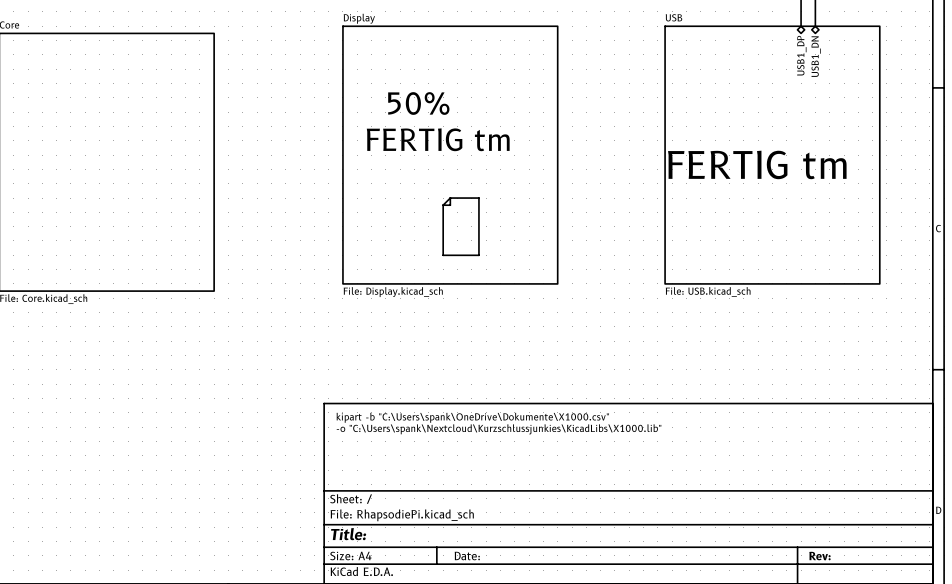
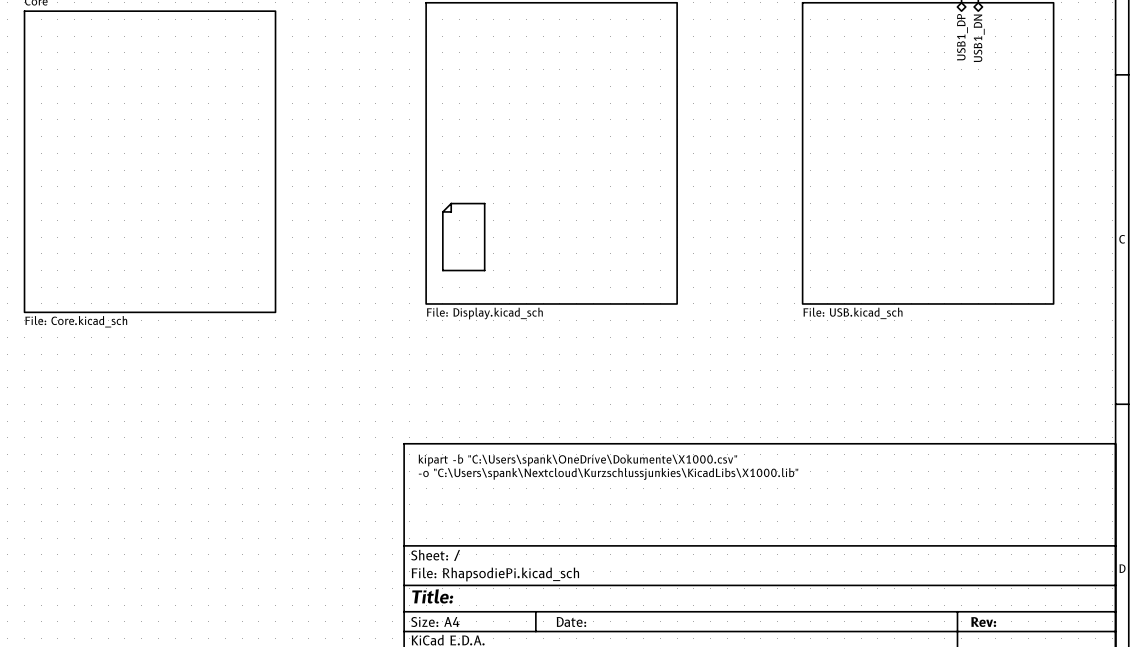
text: 50% (418, 103) -> none
text: FERTIG tm (438, 139) -> none
text: FERTIG tm (757, 164) -> none
line: (450, 198) (443, 205) -> (451, 203) (442, 211)
line: (450, 198) (478, 198) (478, 255) (443, 255) (443, 205) -> (451, 203) (484, 203) (484, 270) (442, 270) (442, 211)
line: (450, 198) (450, 205) (443, 205) -> (451, 203) (451, 211) (442, 211)

